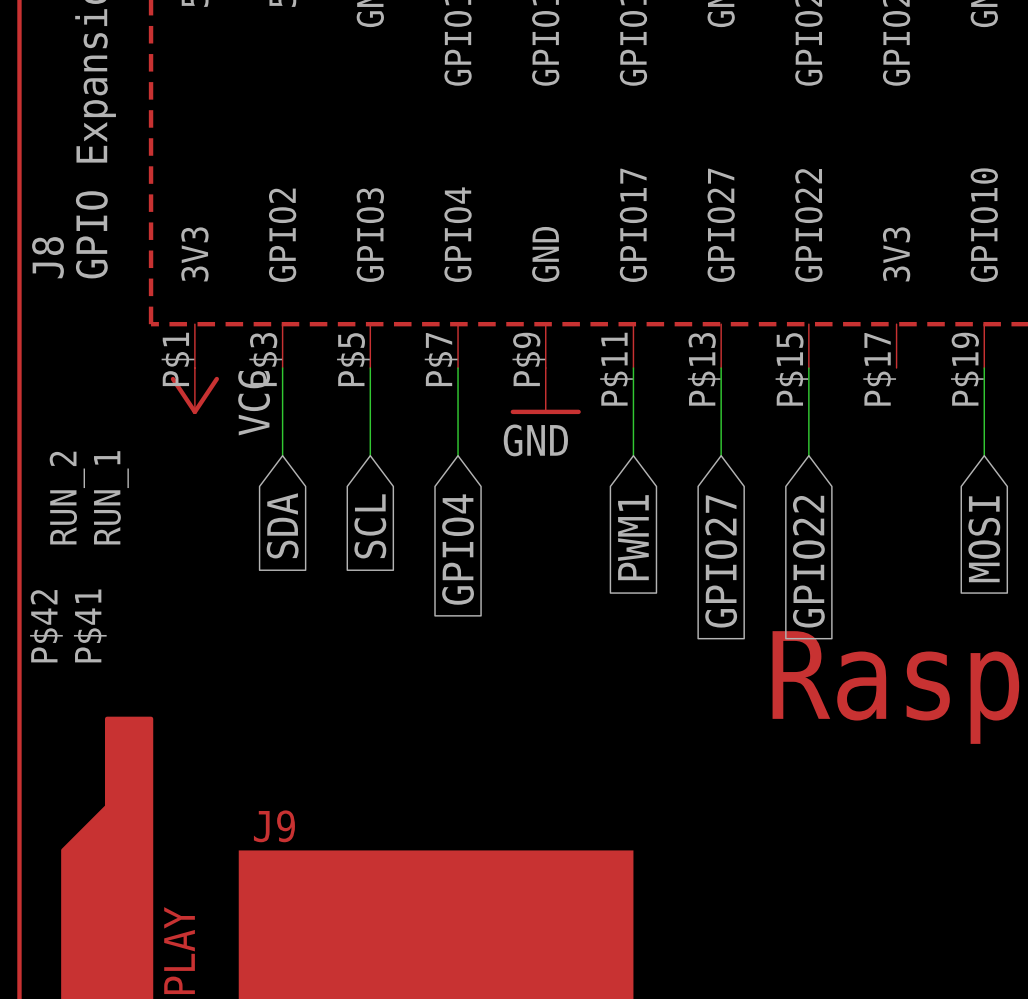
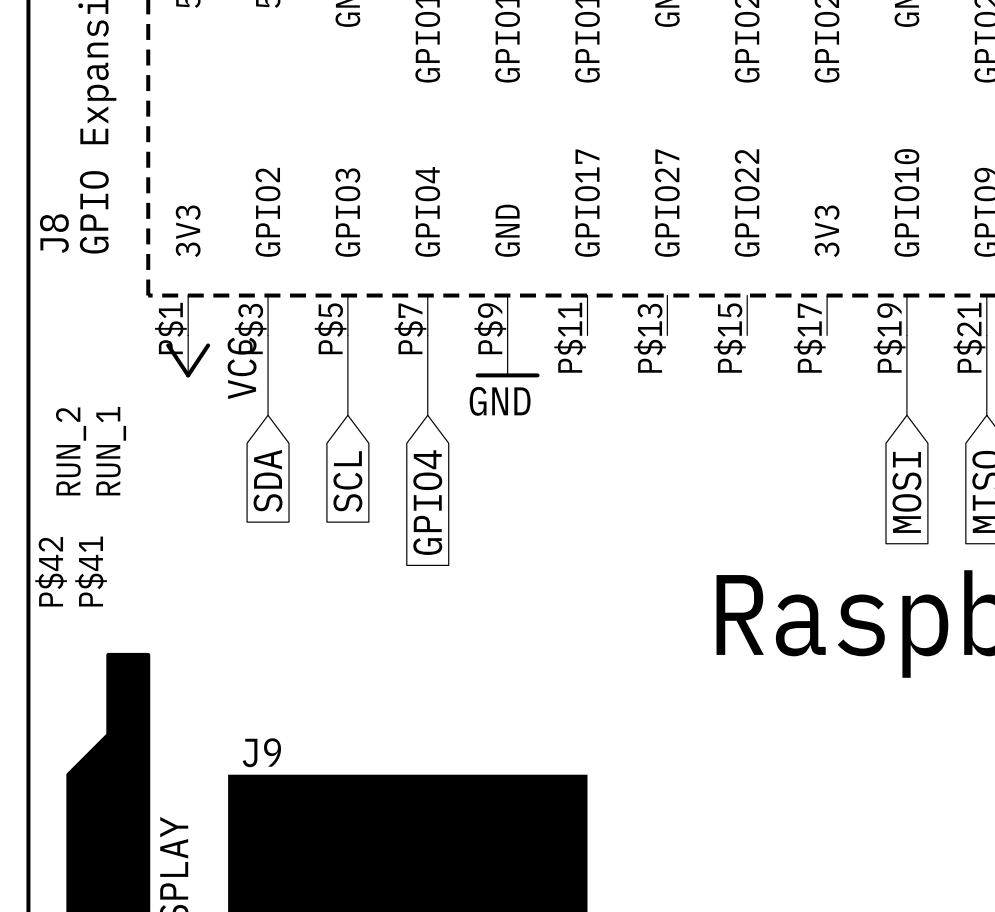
wire: (633, 368) (633, 455) -> none
wire: (721, 368) (721, 455) -> none
wire: (808, 368) (808, 455) -> none
global label: PWM1 (633, 537) -> none
global label: GPIO27 (721, 561) -> none
global label: GPIO22 (808, 561) -> none

